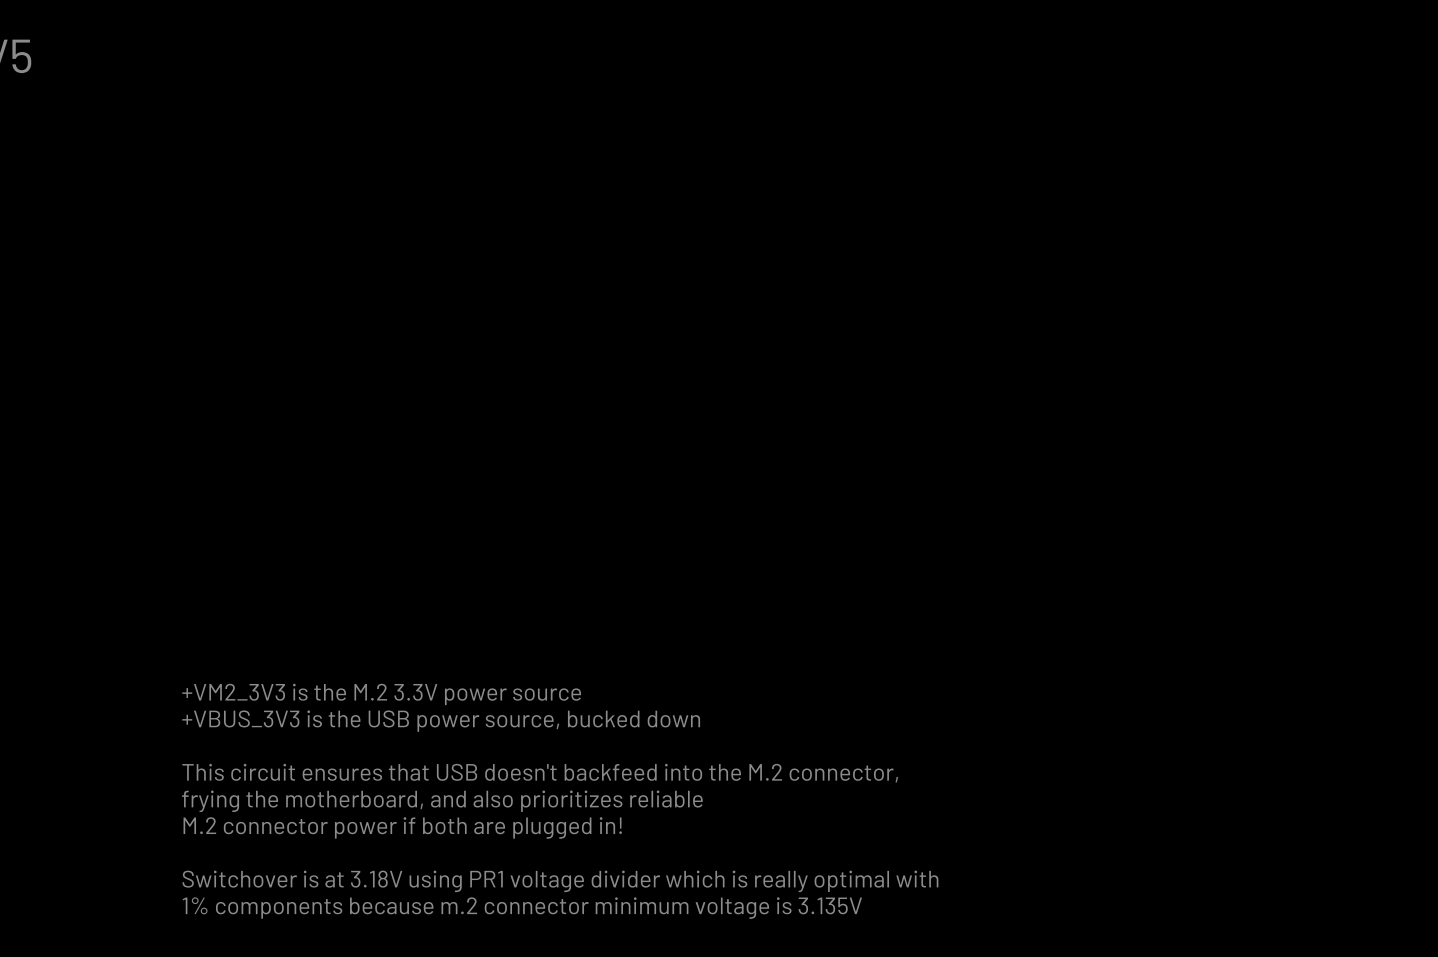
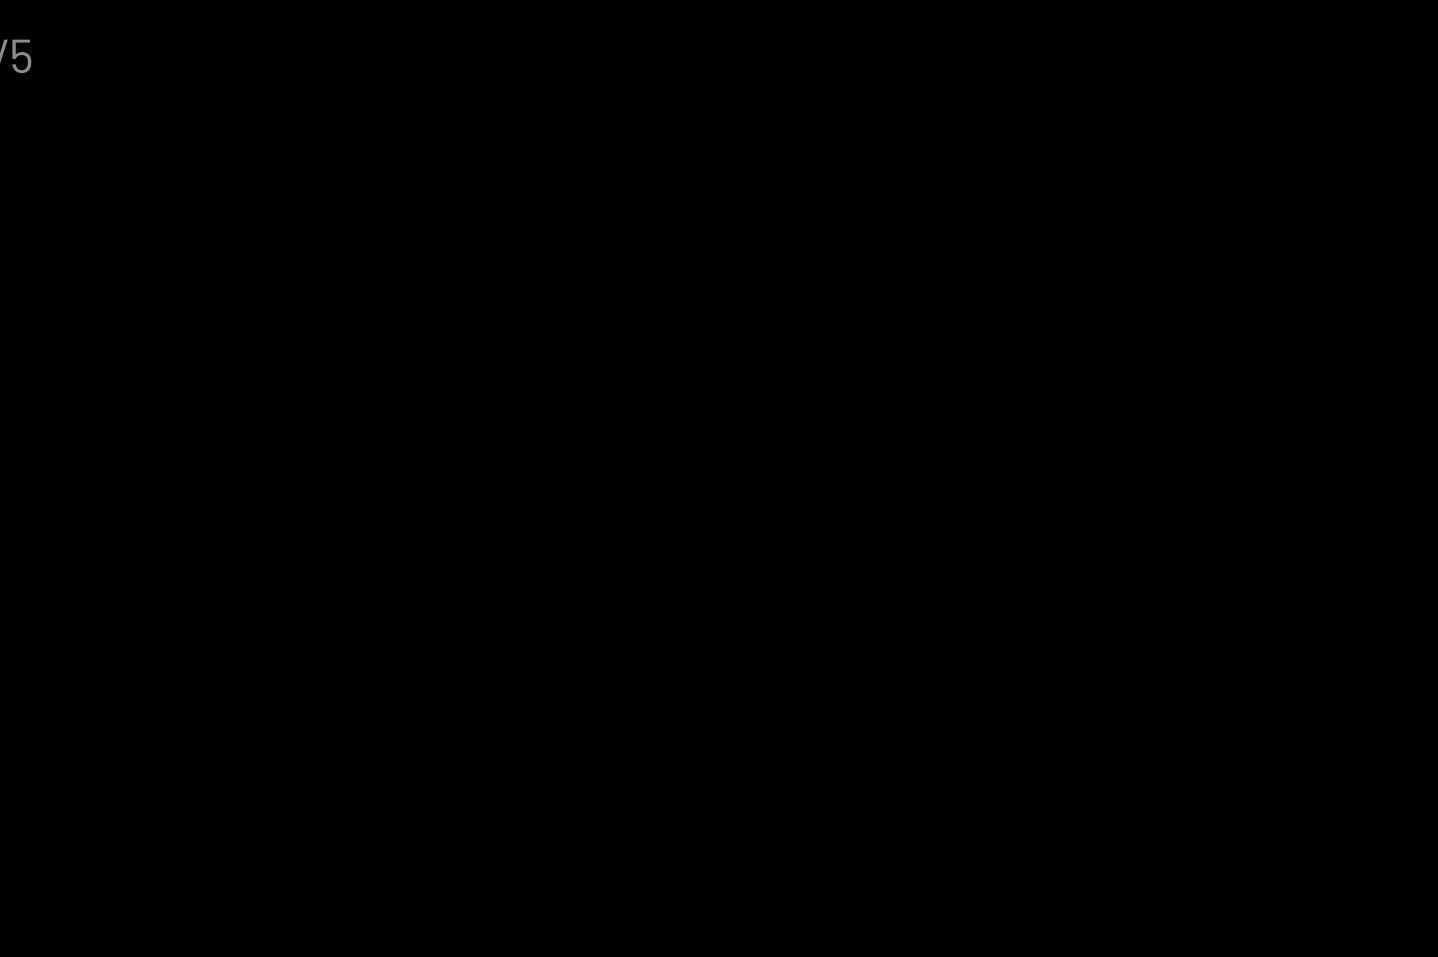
text: +VM2_3V3 is the M.2 3.3V power source (381, 694) -> none
text: +VBUS_3V3 is the USB power source, bucked down (441, 721) -> none
text: This circuit ensures that USB doesn't backfeed into the M.2 connector, (540, 773) -> none
text: frying the motherboard, and also prioritizes reliable (442, 801) -> none
text: M.2 connector power if both are plugged in! (402, 827) -> none
text: Switchover is at 3.18V using PR1 voltage divider which is really optimal with (560, 881) -> none
text: 1% components because m.2 connector minimum voltage is 3.135V (522, 908) -> none

